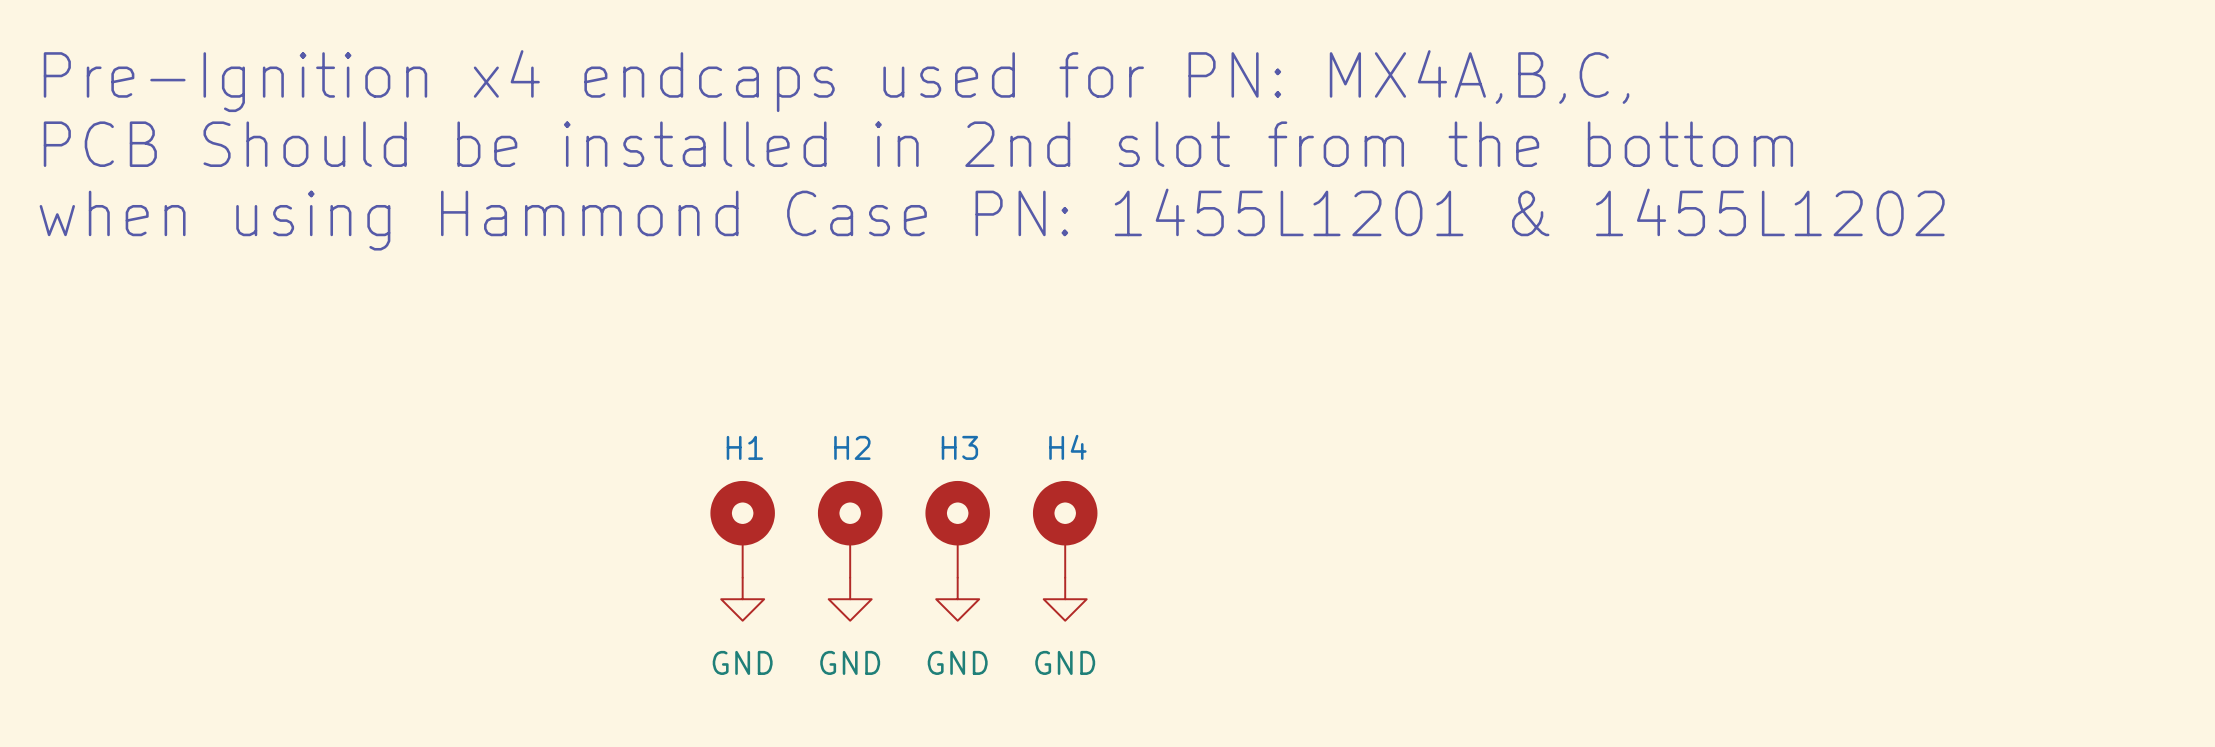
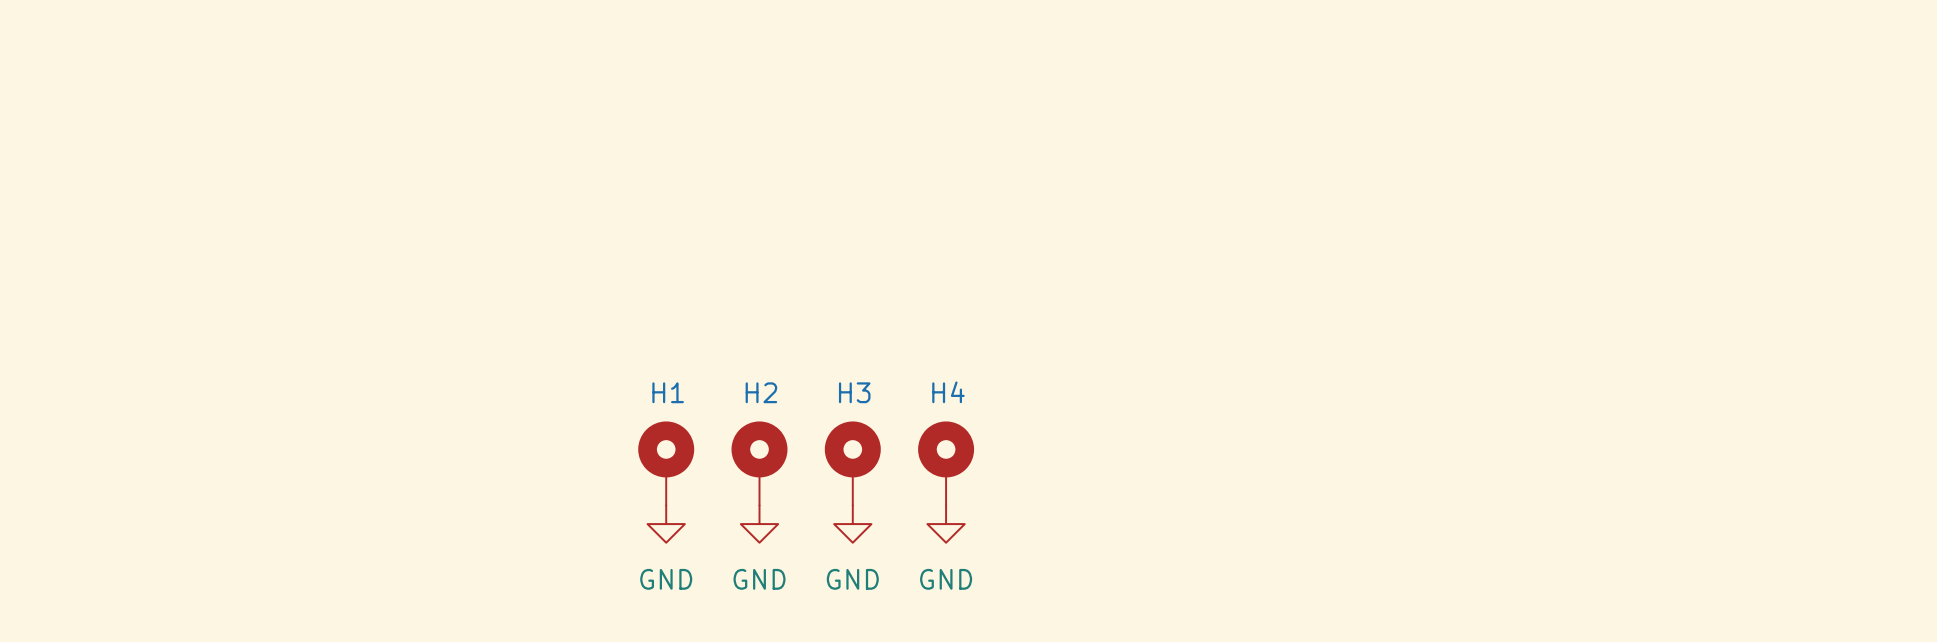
text: Pre-Ignition x4 endcaps used for PN: MX4A,B,C, (836, 81) -> none
text: PCB Should be installed in 2nd slot from the bottom (918, 144) -> none
text: when using Hammond Case PN: 1455L1201 & 1455L1202 (992, 219) -> none

